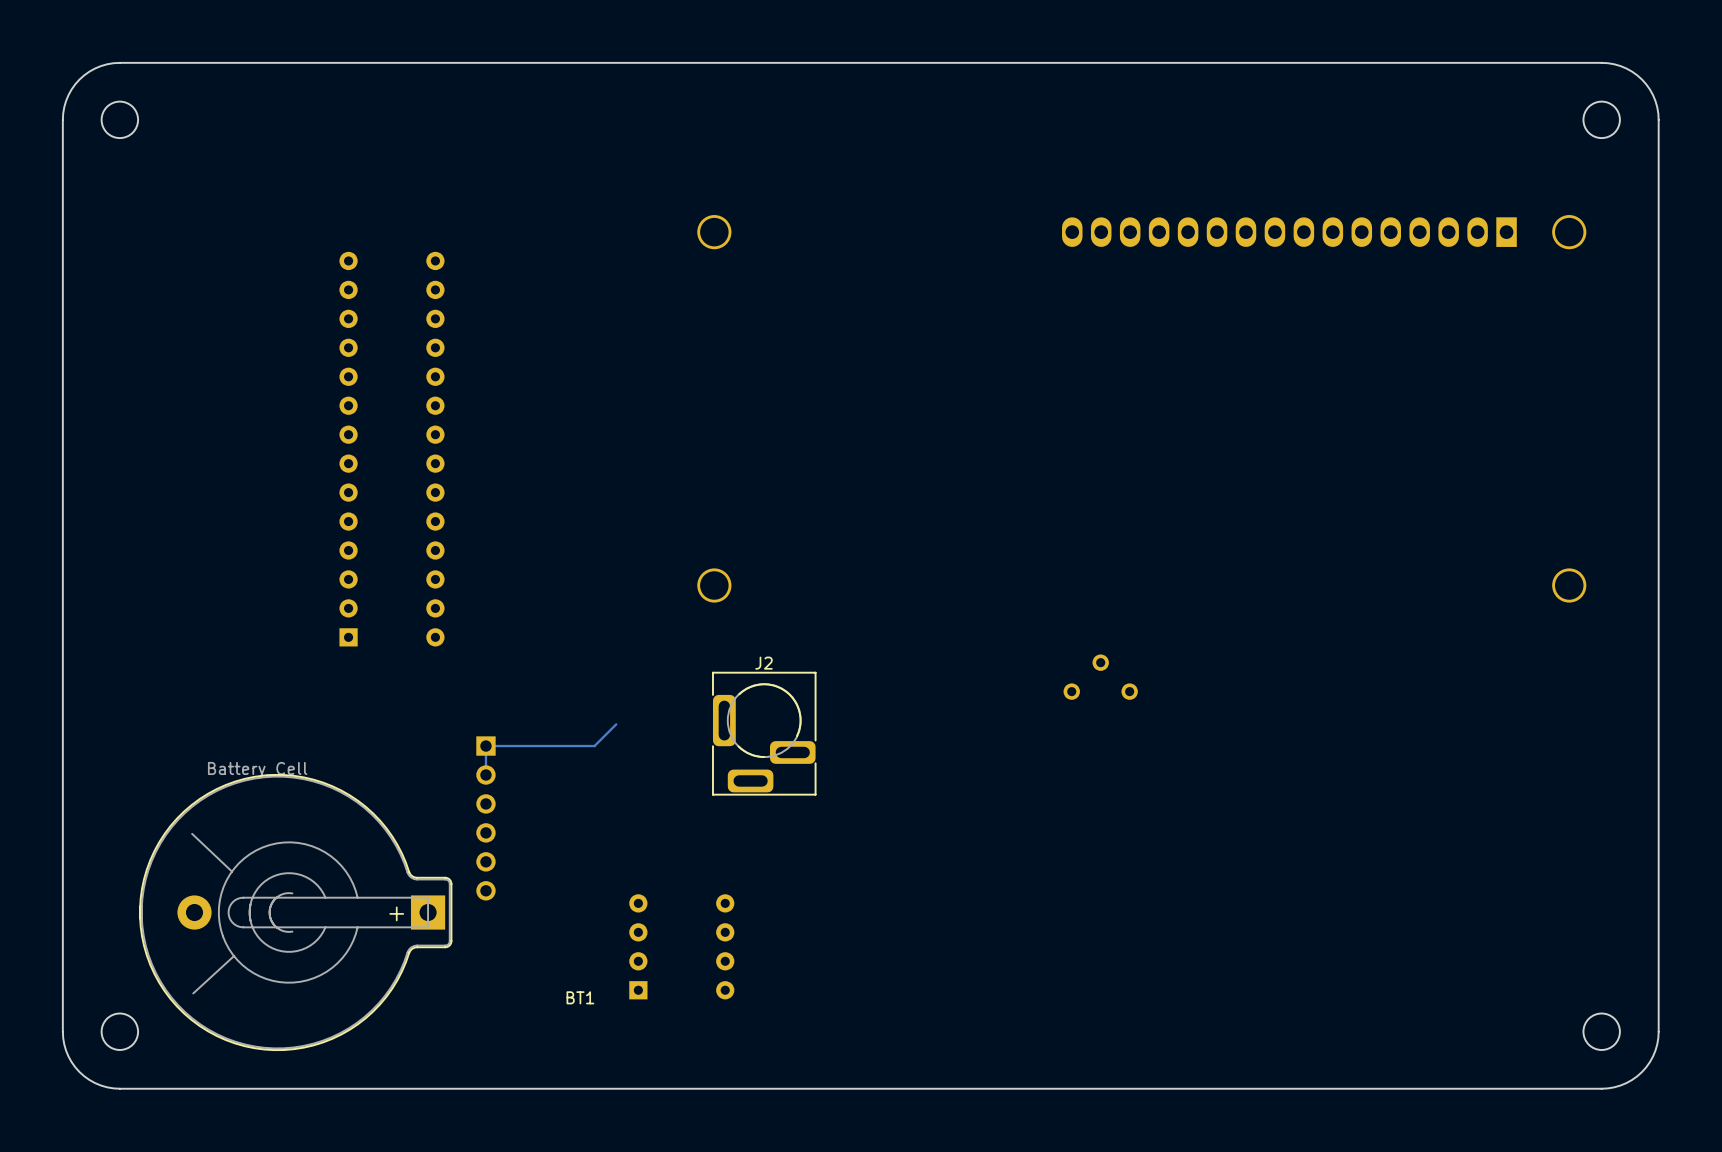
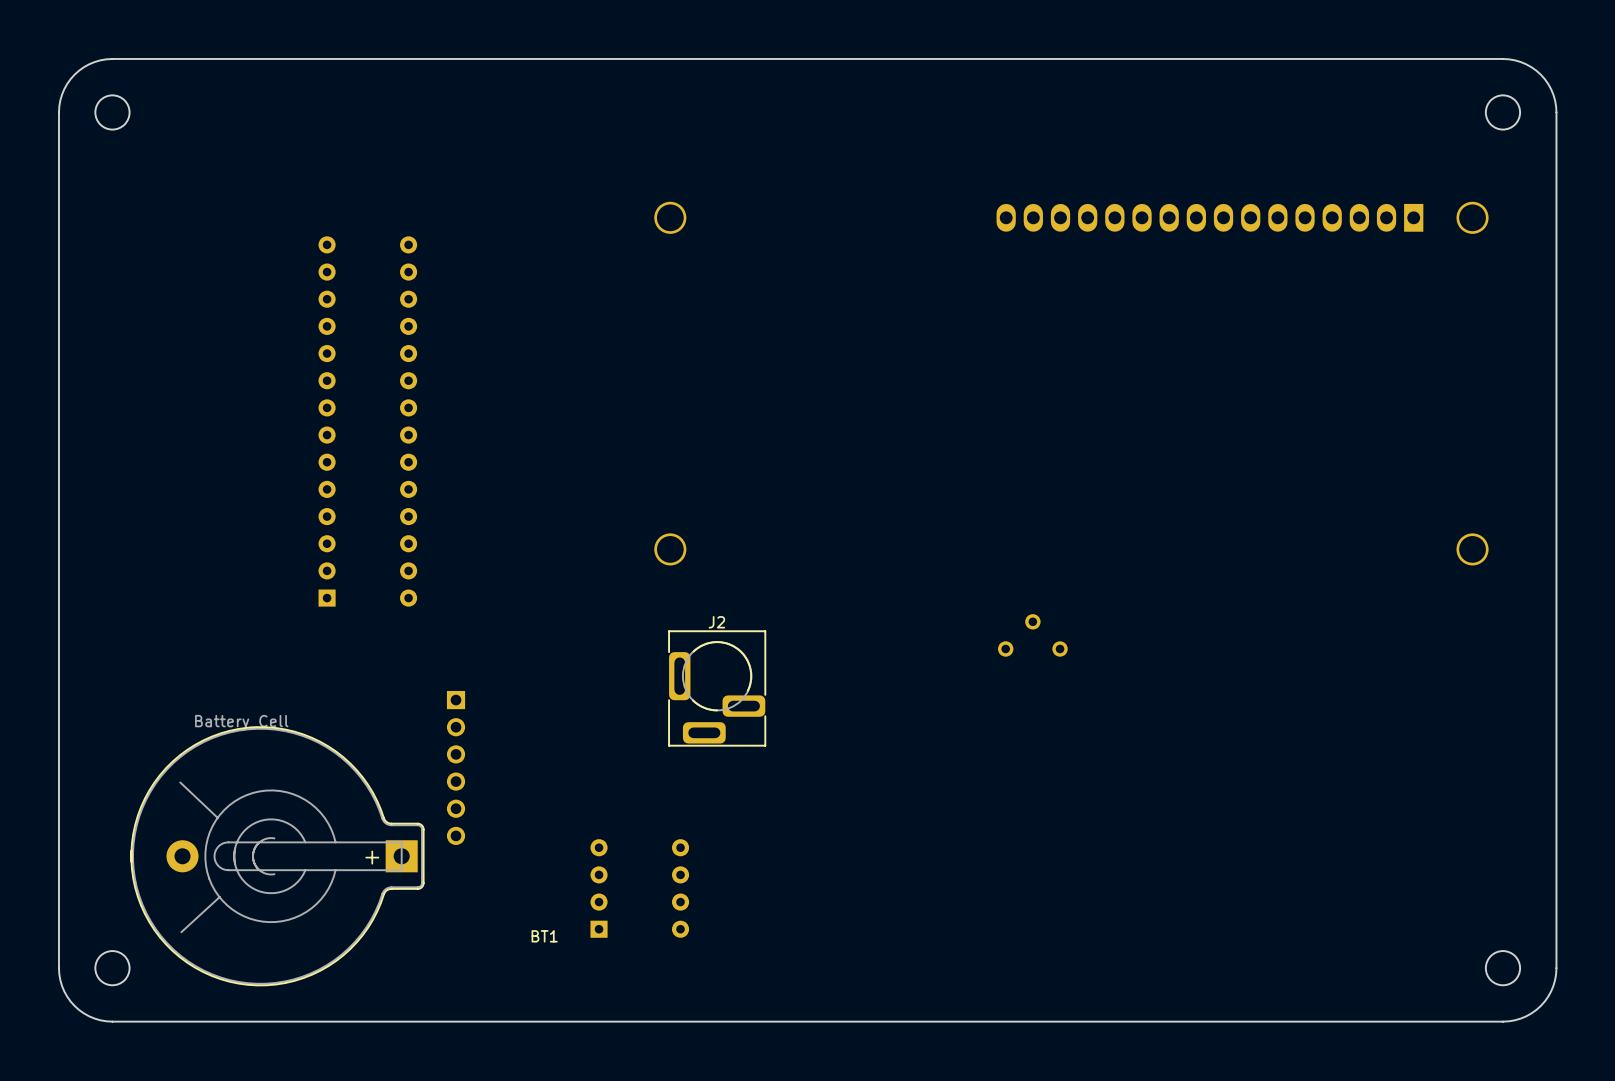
track: (616, 724) (594, 746) (485, 746) (485, 774) -> none

